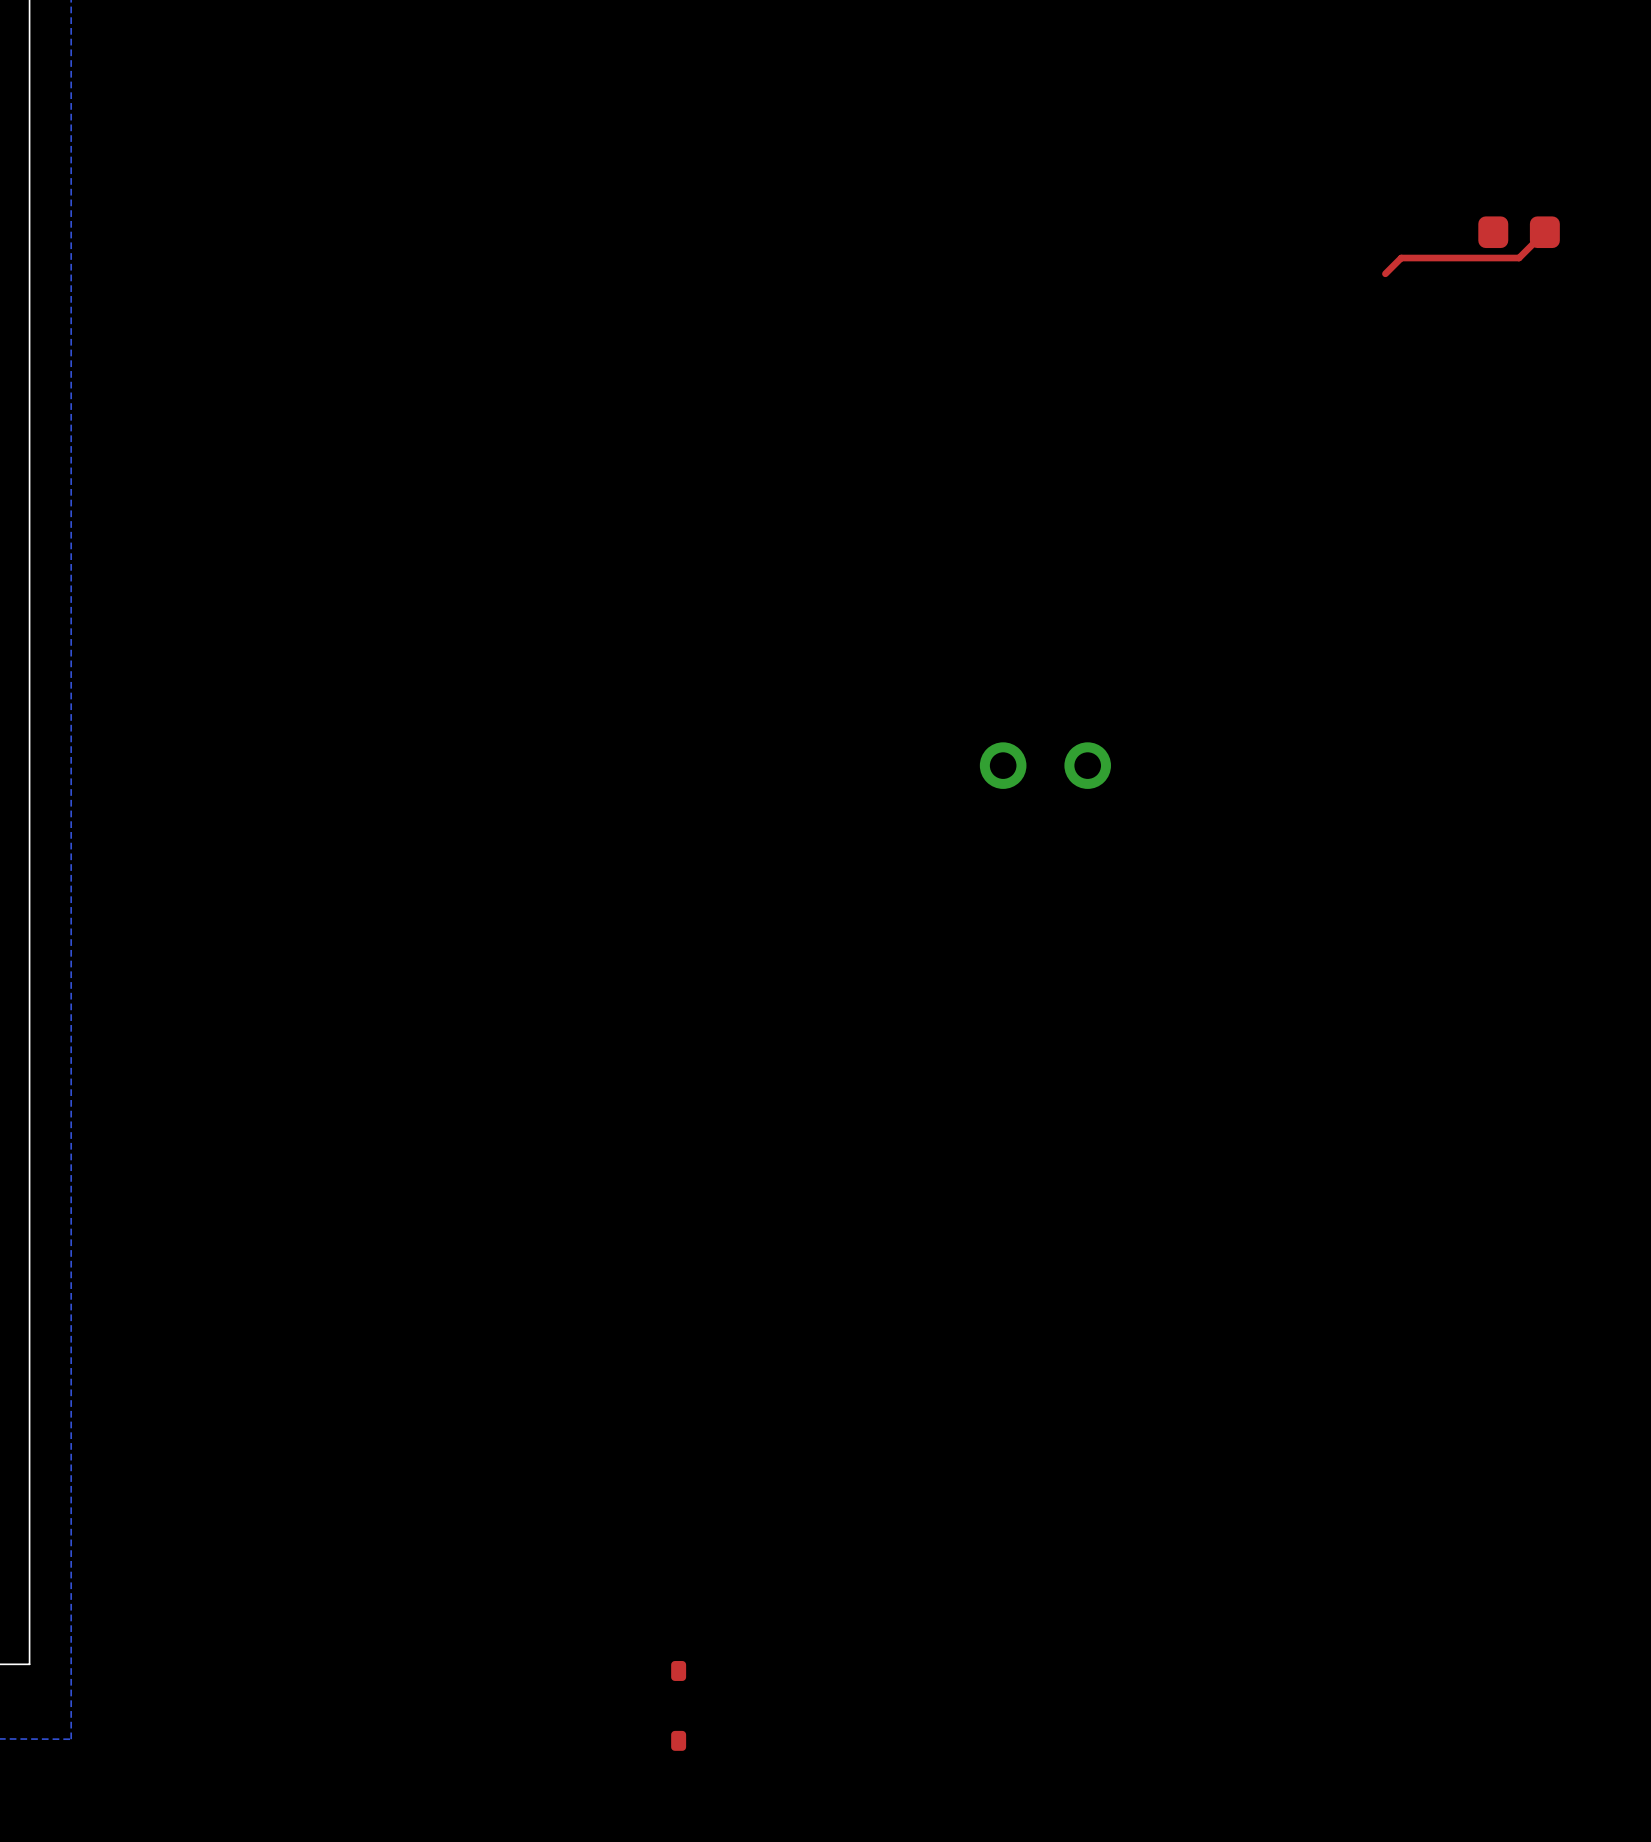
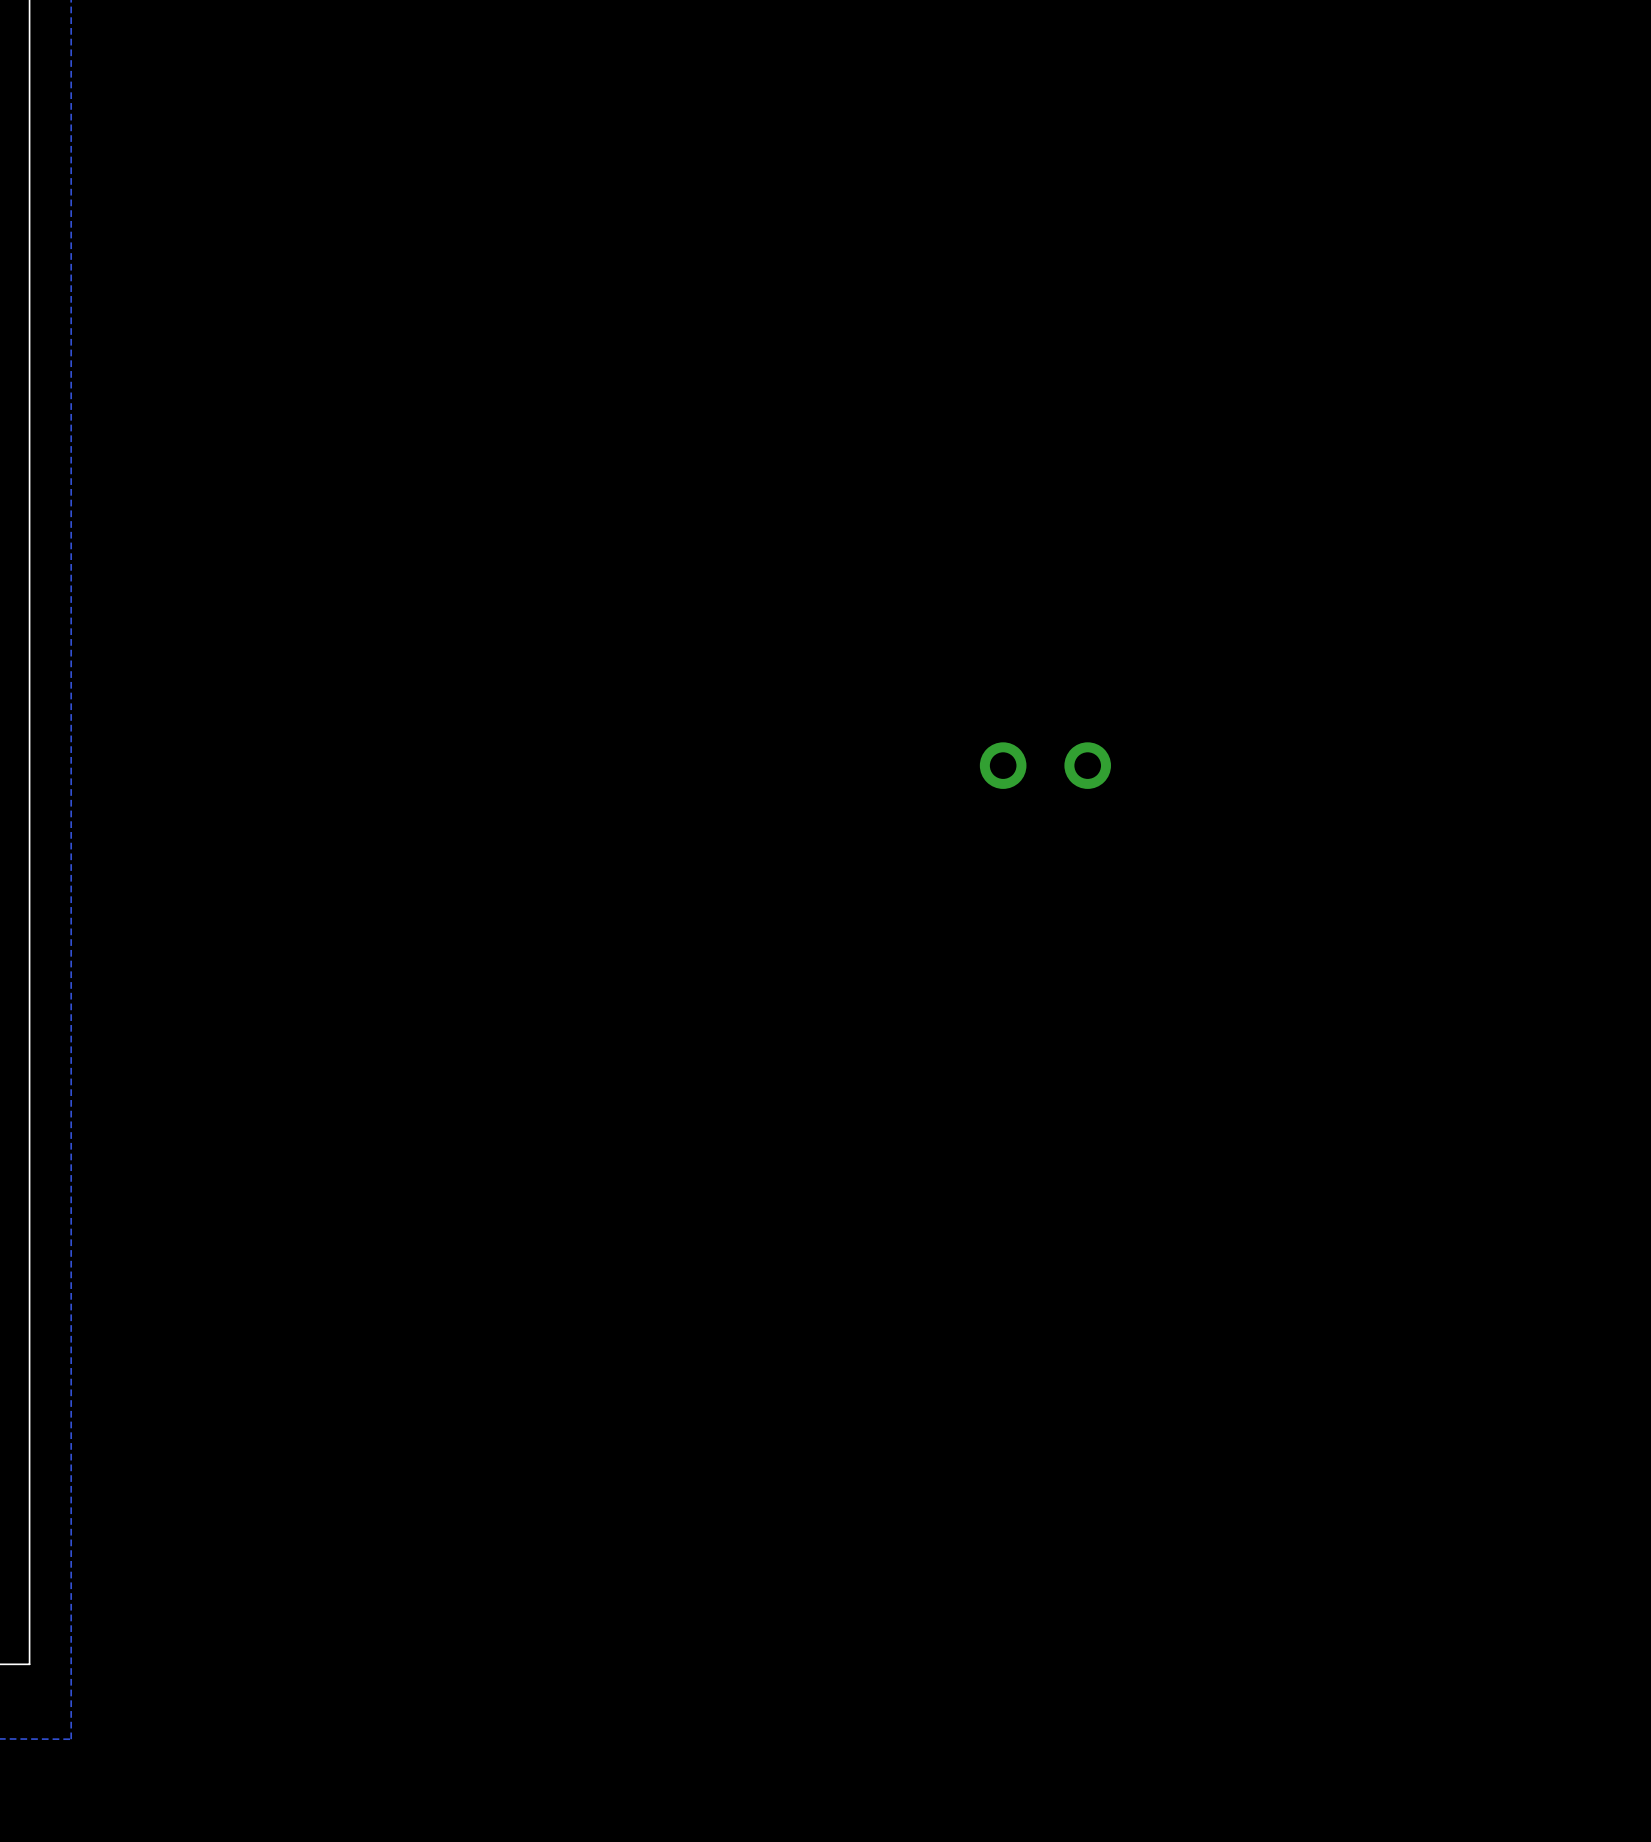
part: (1519, 232) -> none
top track: (1544, 232) (1519, 258) (1401, 258) (1385, 273) -> none
part: (678, 1705) -> none

